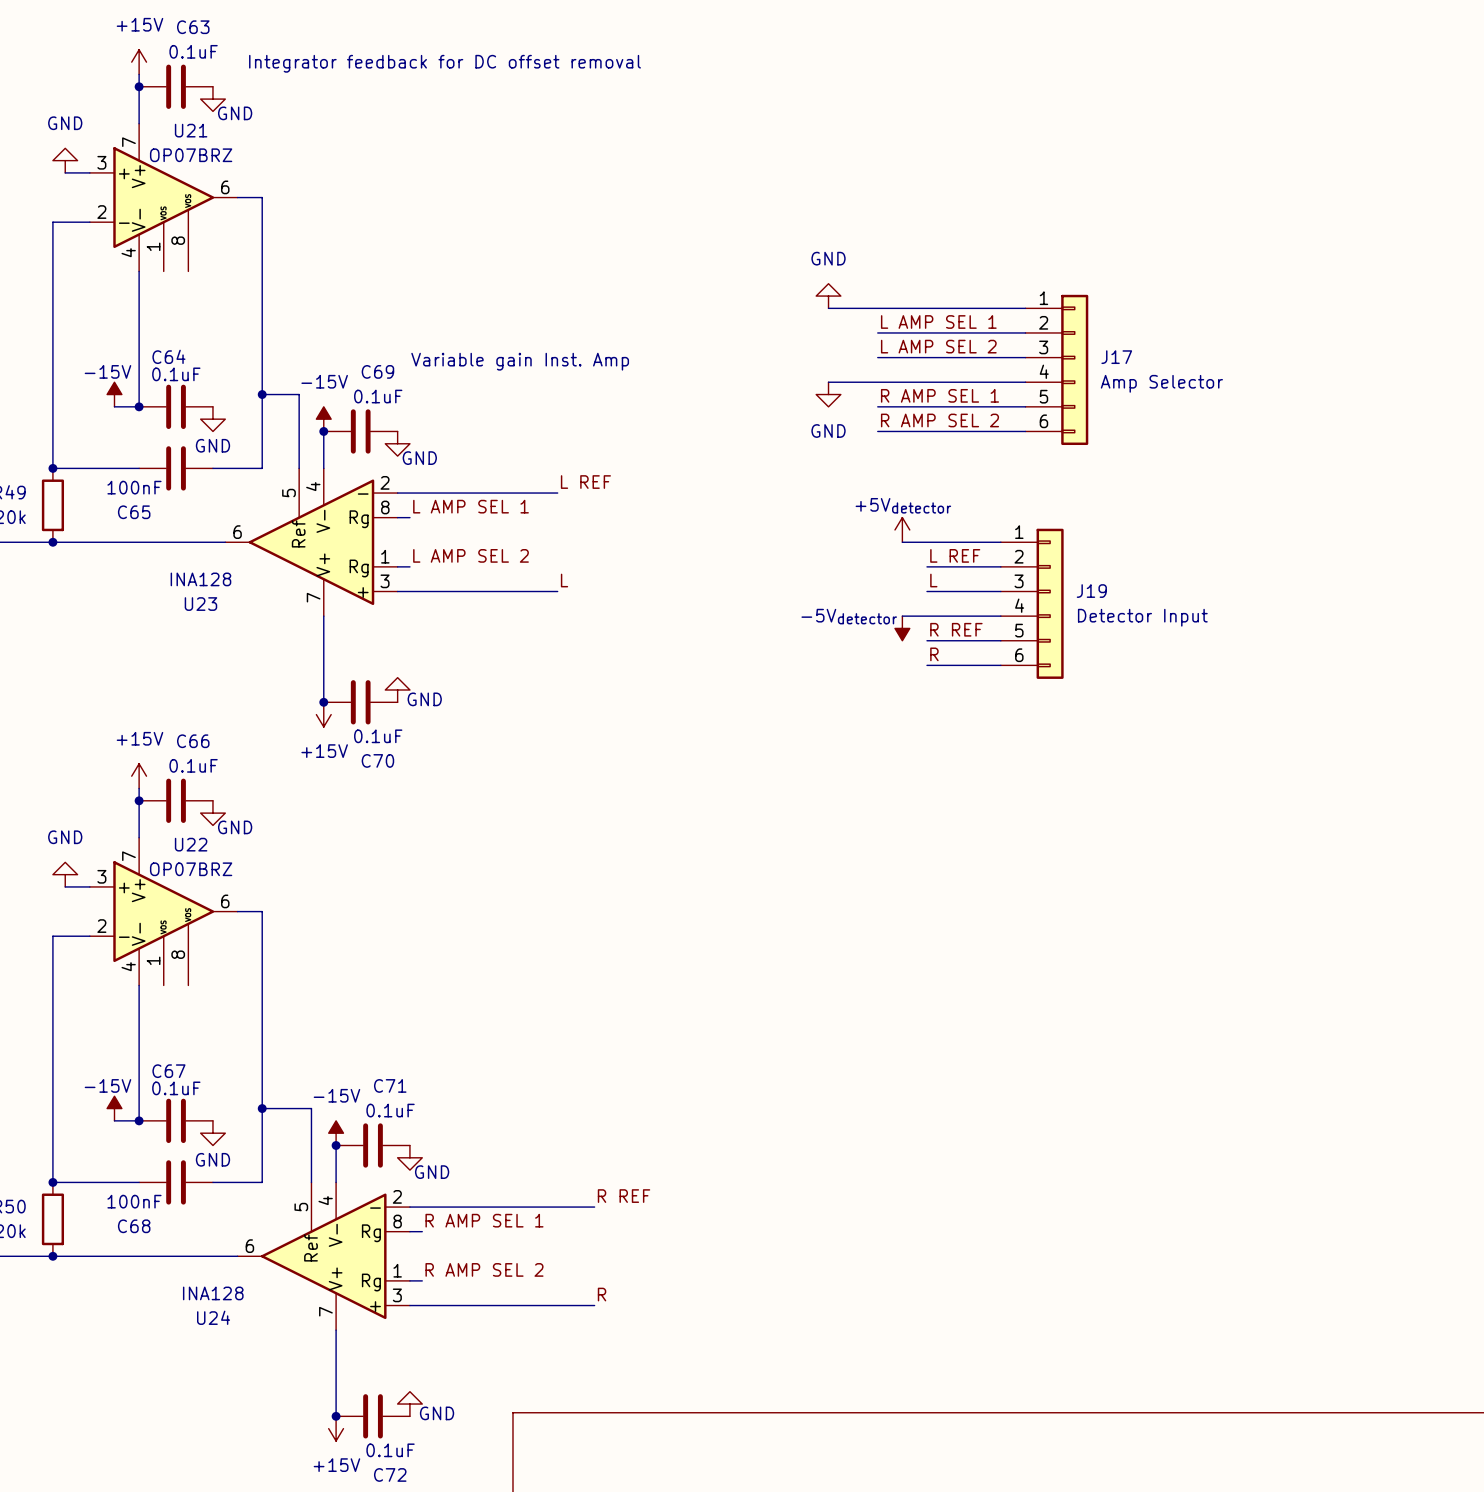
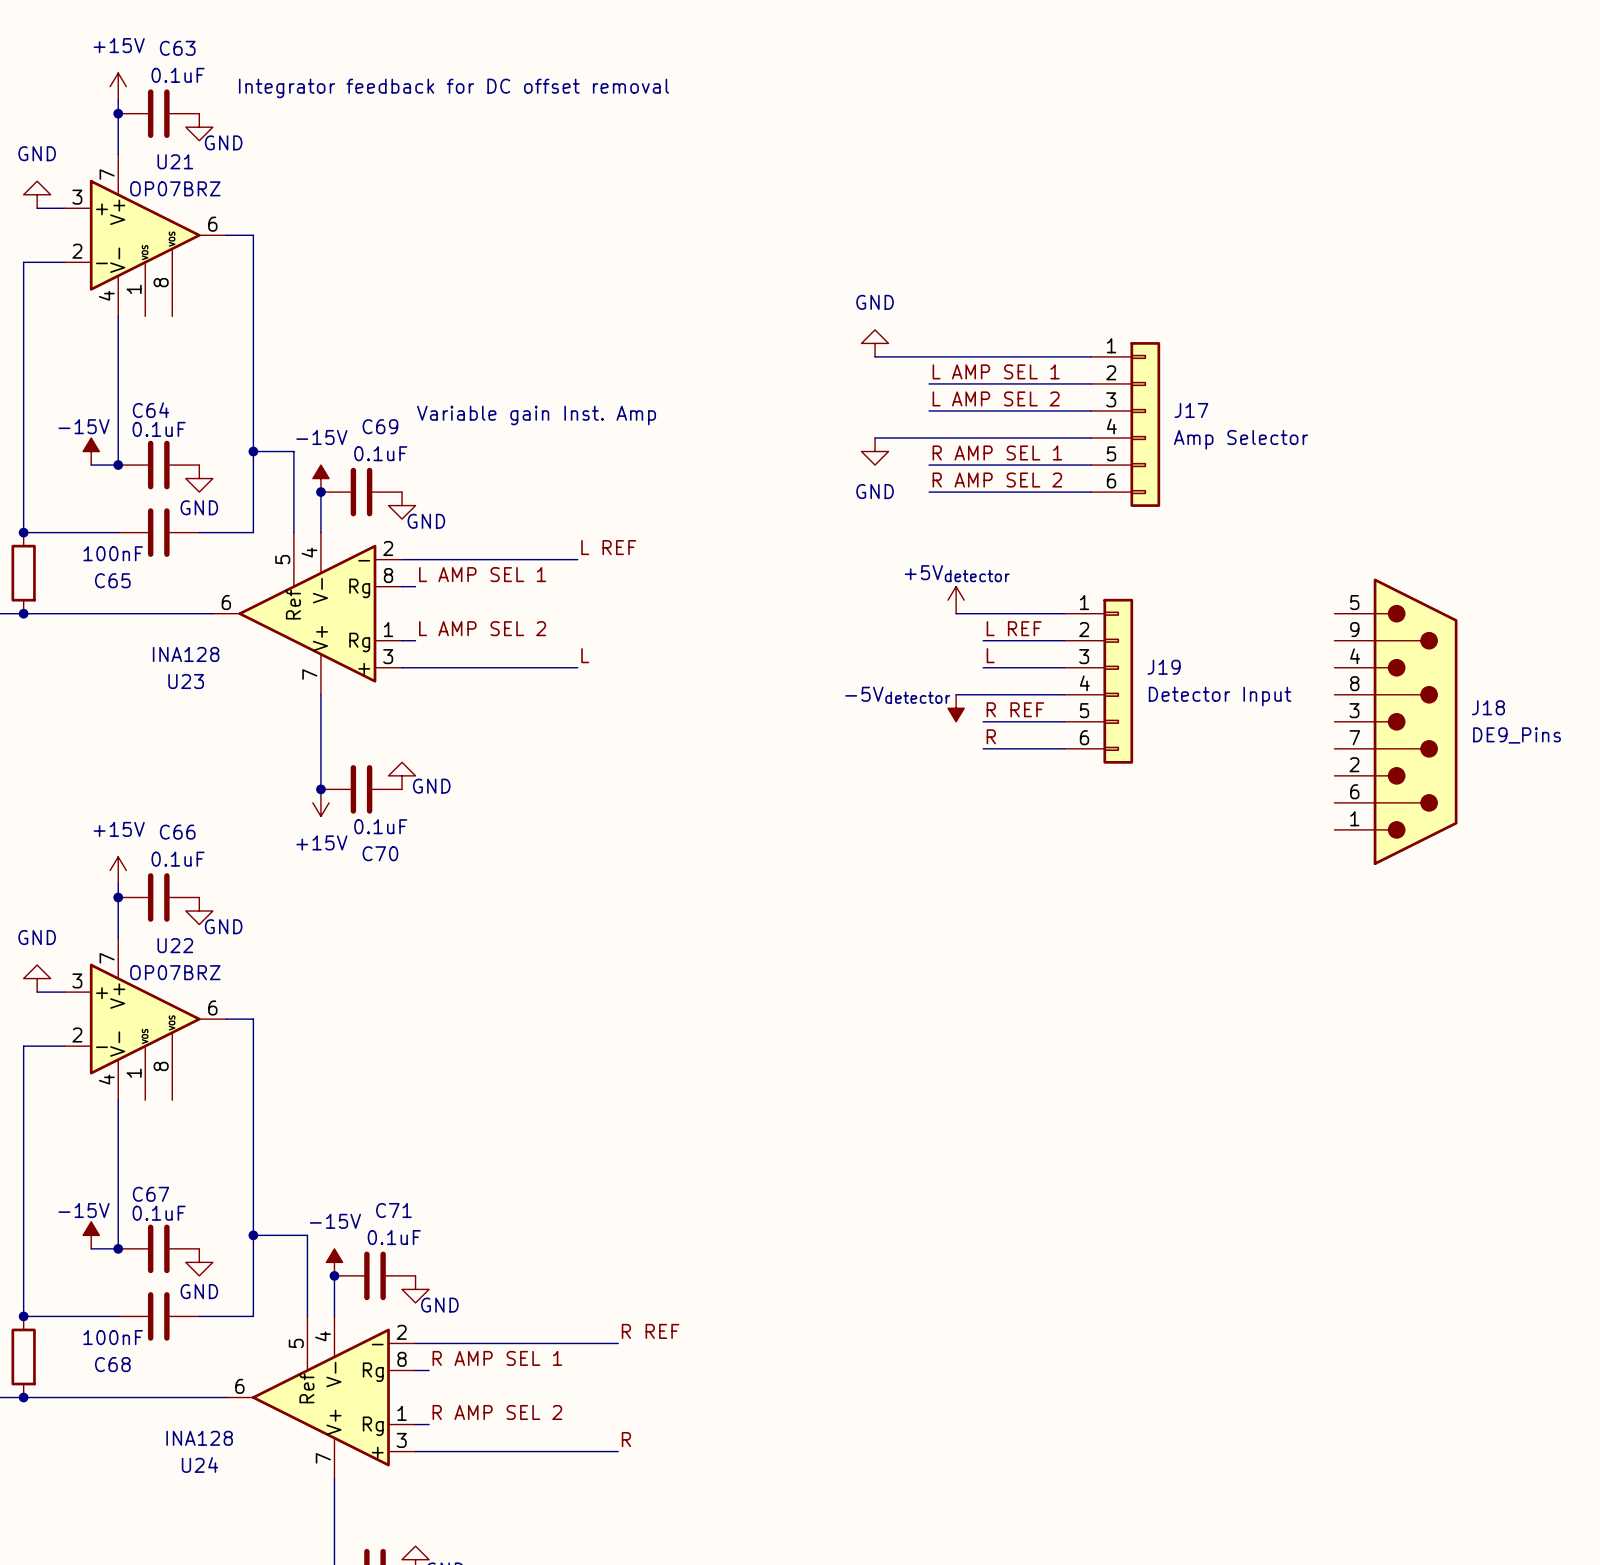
J18: none -> DE9_Pins (1396, 721)

